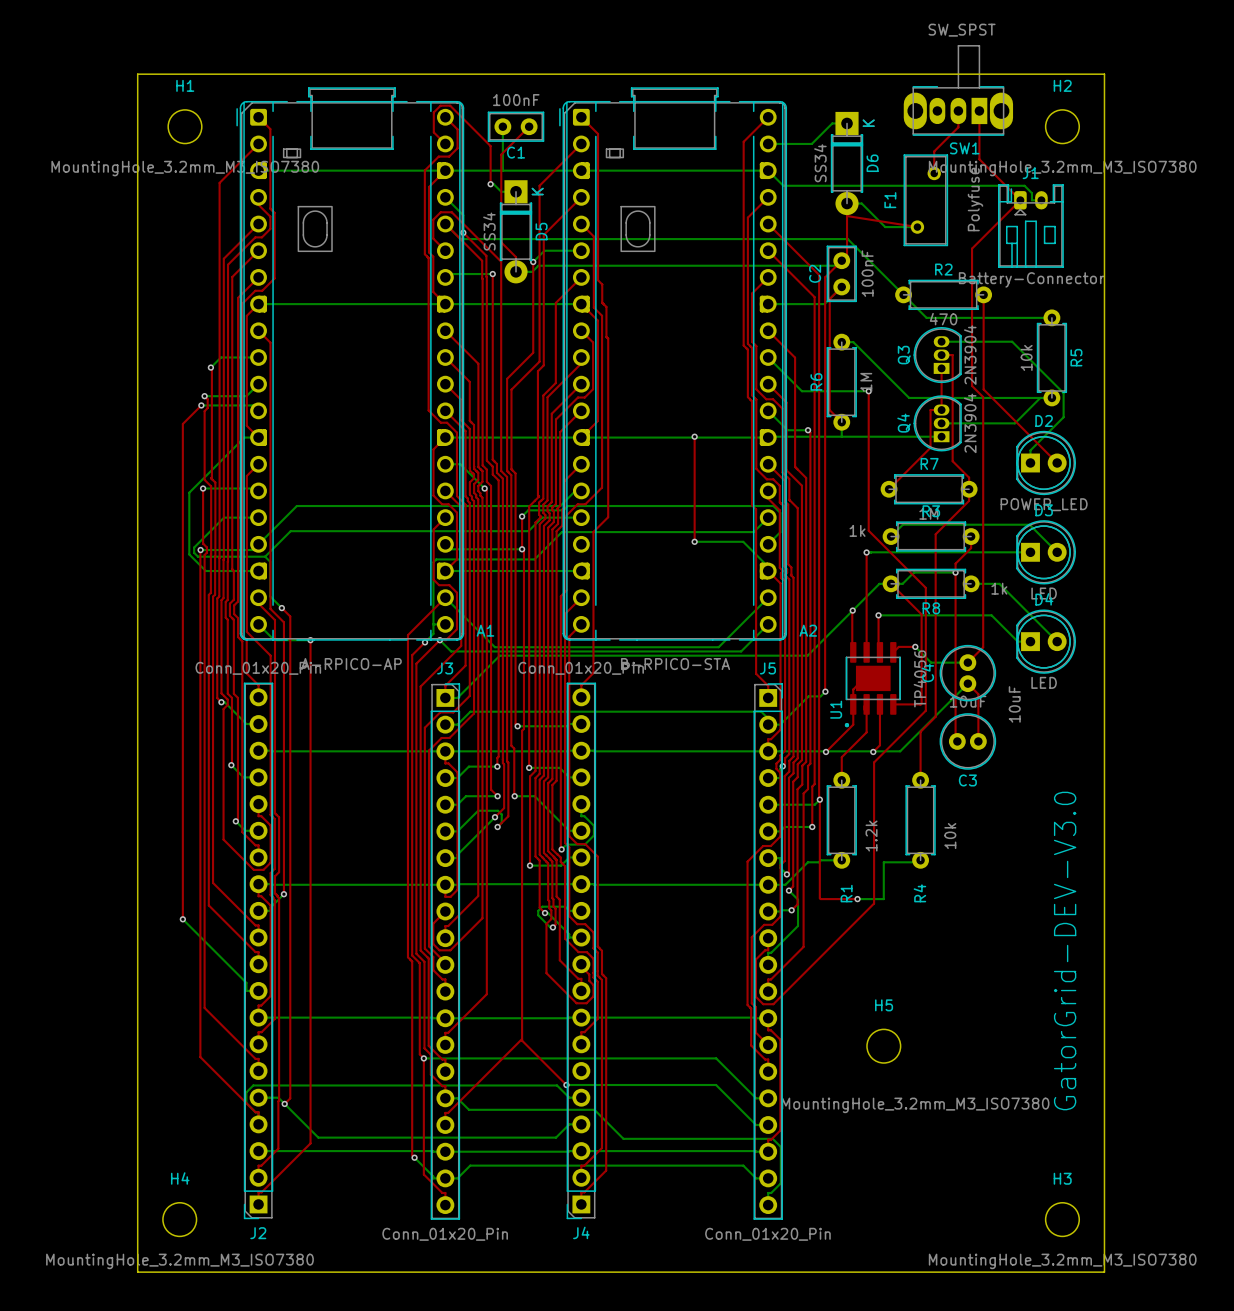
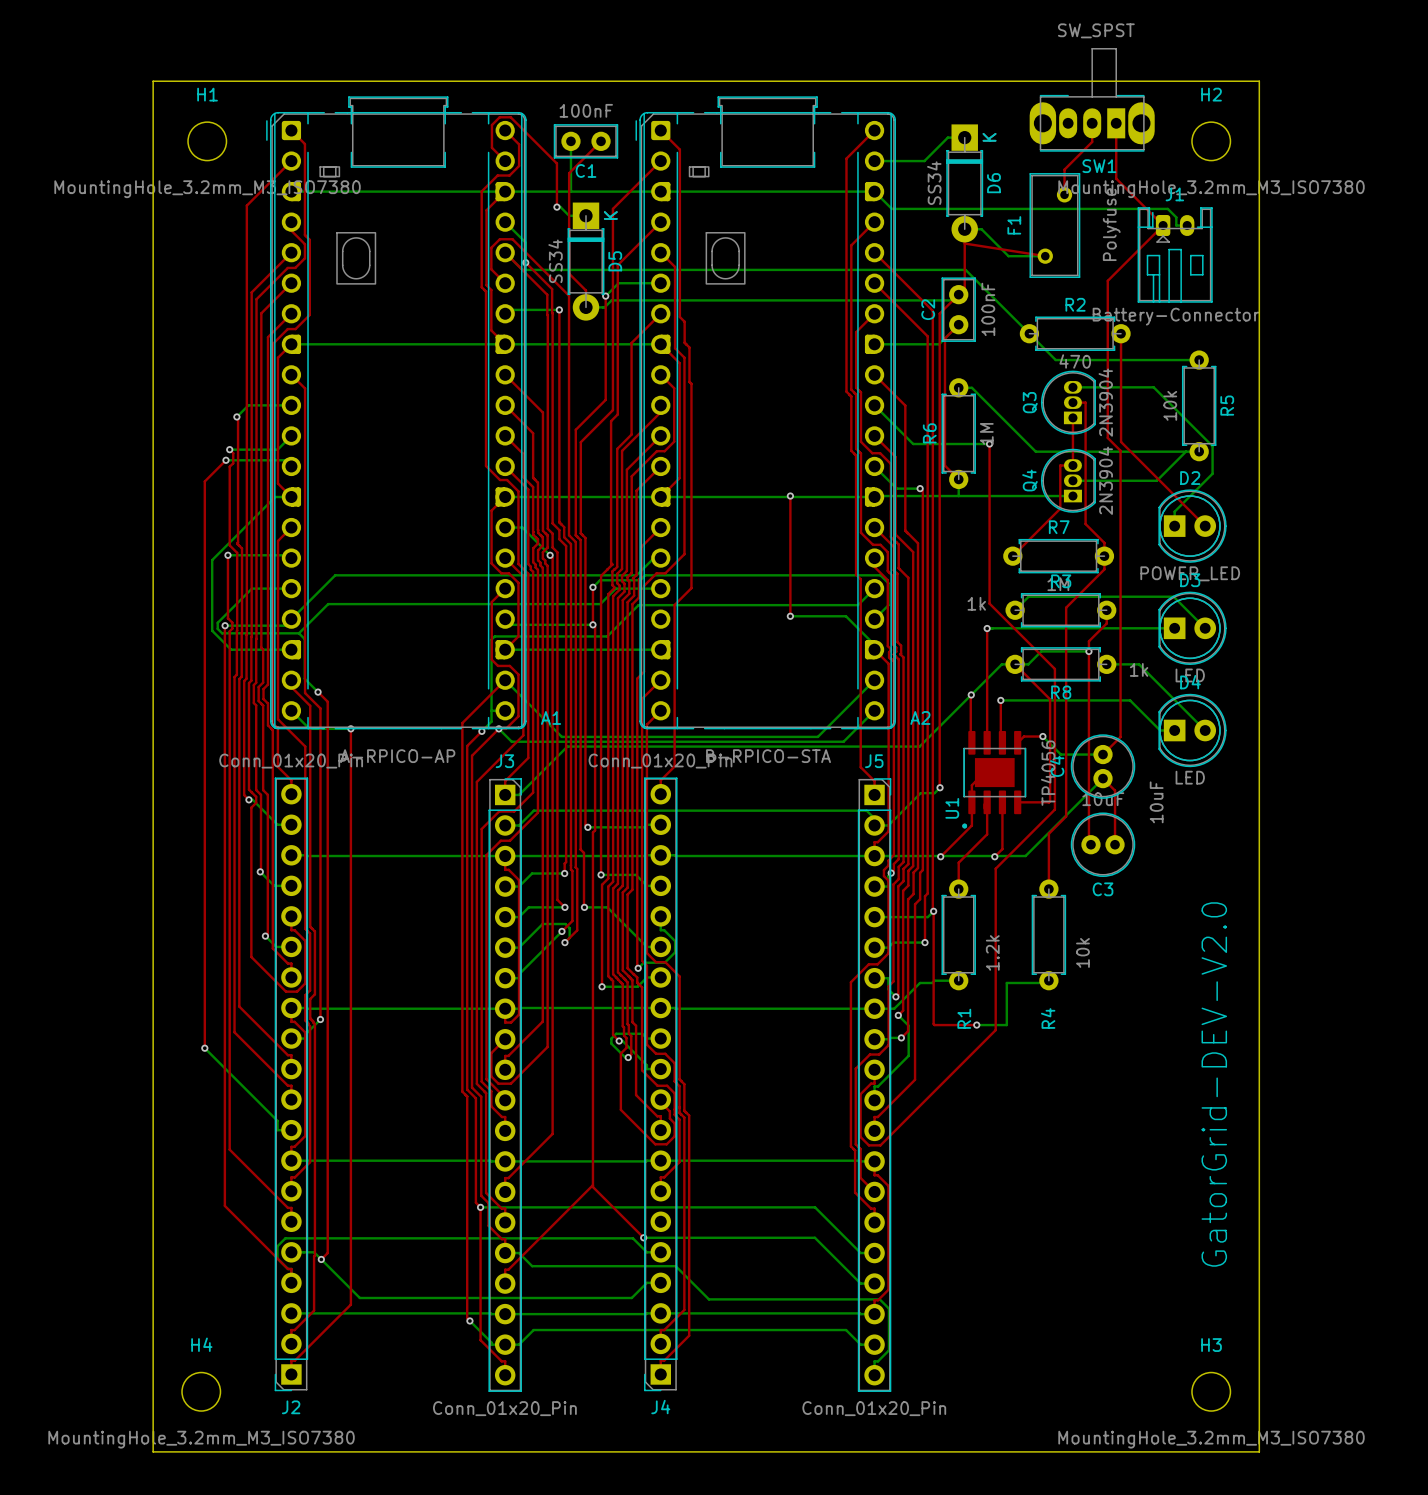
text: GatorGrid-DEV-V3.0 (1065, 951) -> GatorGrid-DEV-V2.0 (1214, 1084)
H5: MountingHole_3.2mm_M3_ISO7380 (883, 1046) -> none

